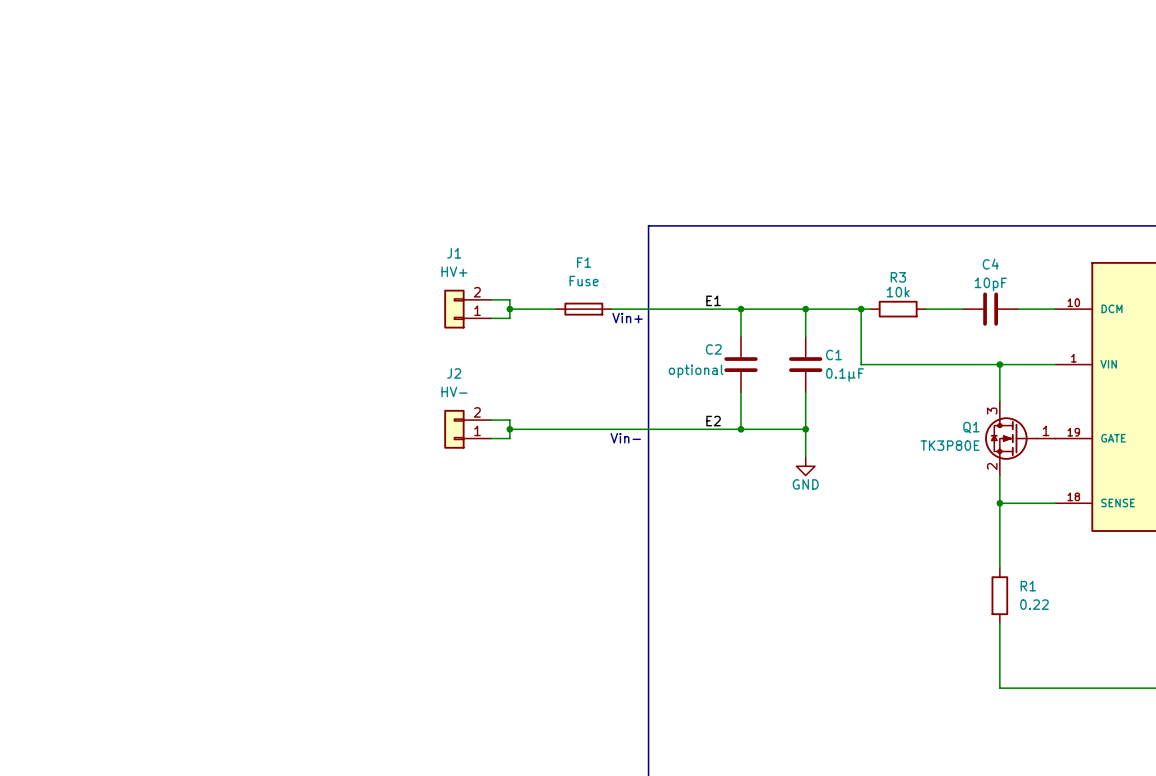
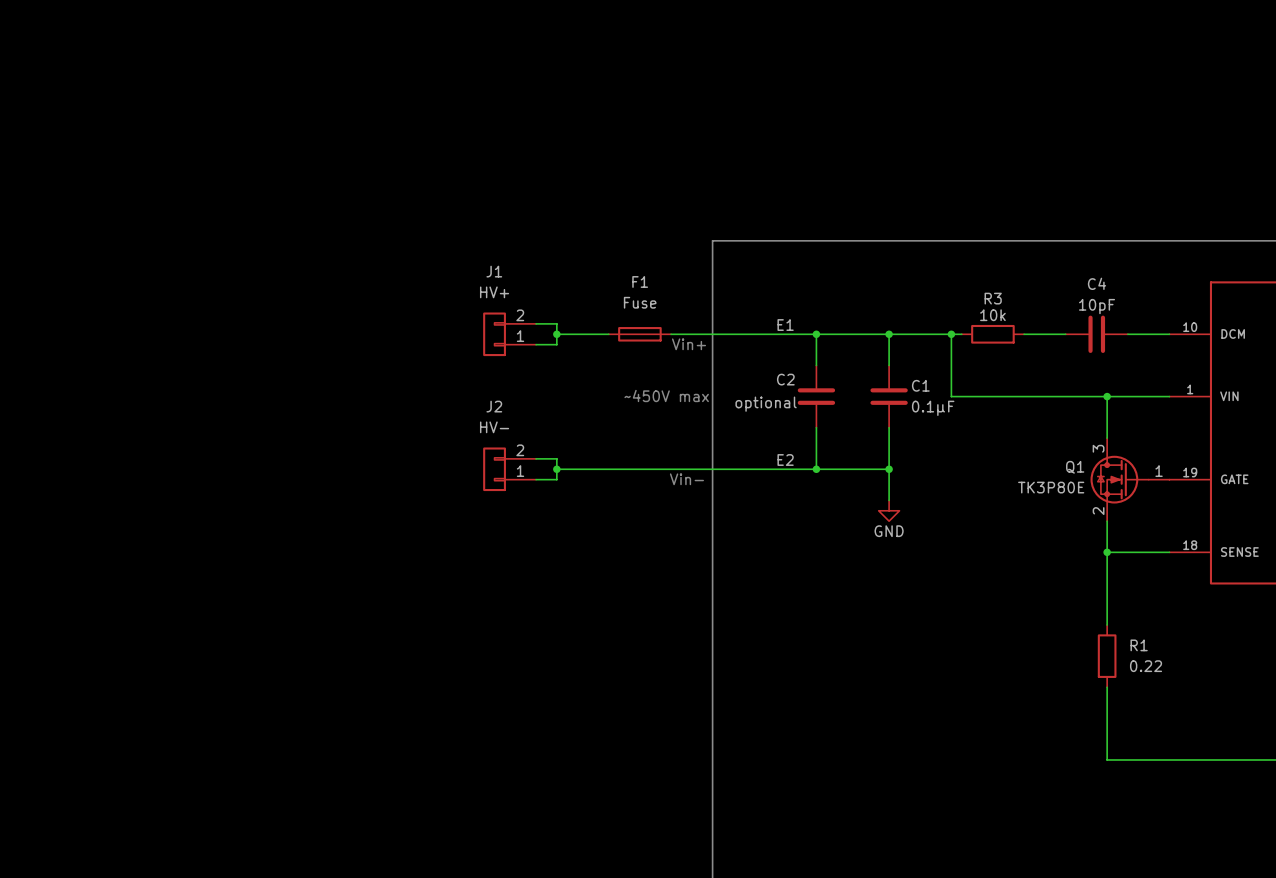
text: none -> ~450V max (666, 395)

